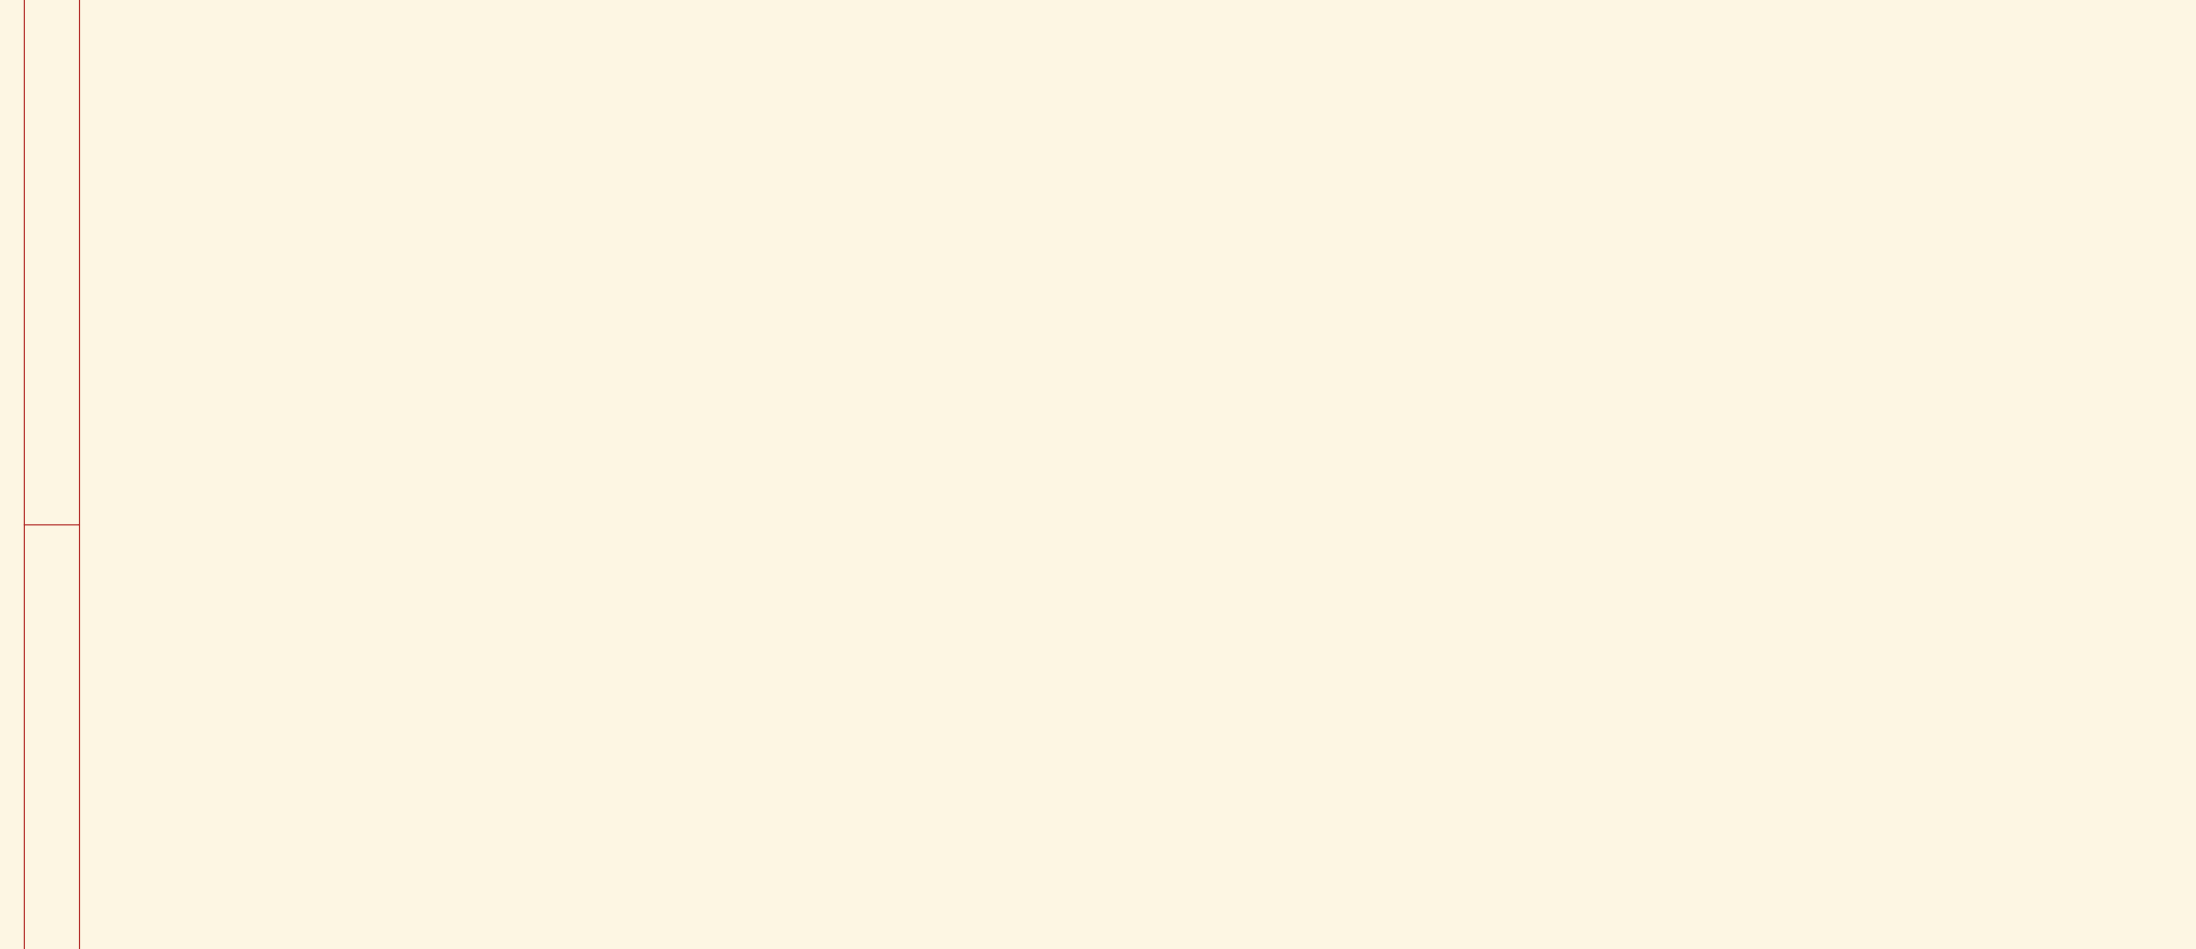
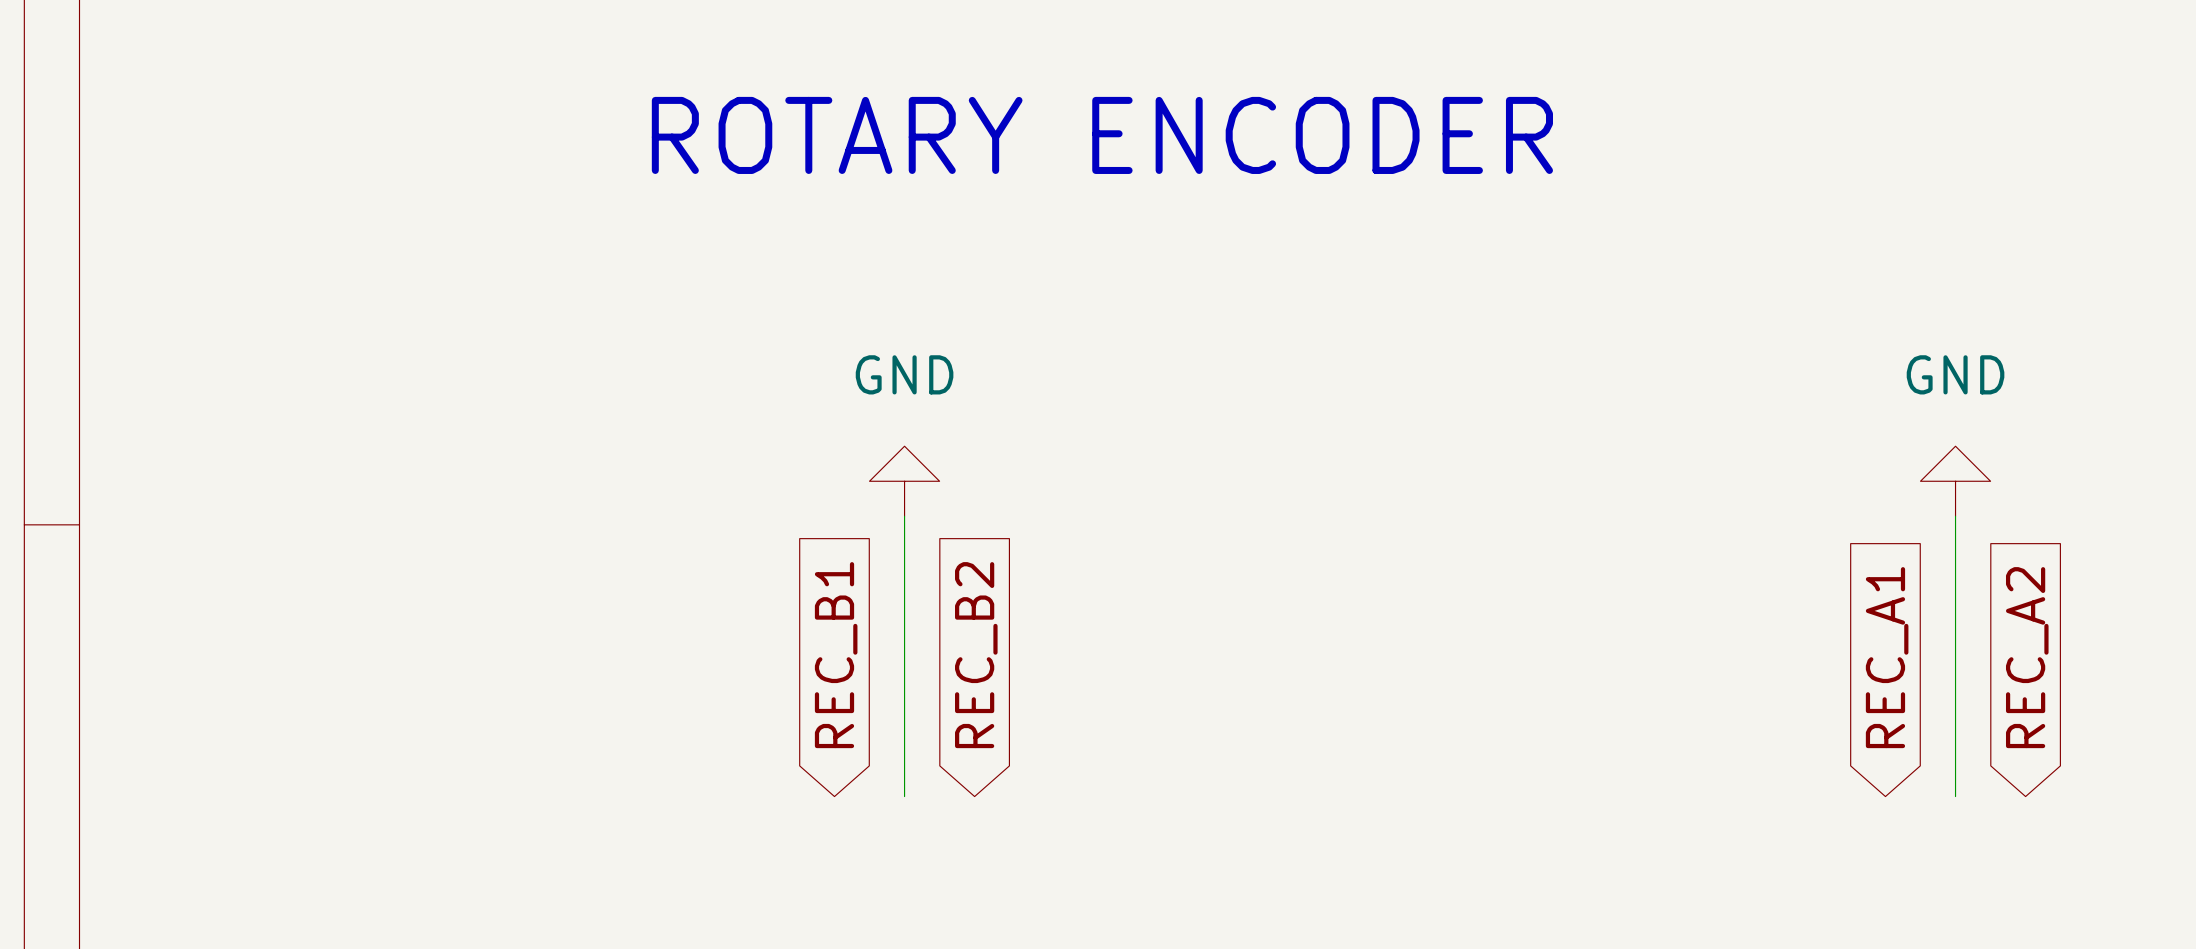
text: none -> ROTARY ENCODER (1102, 135)
power symbol: none -> GND (904, 481)
power symbol: none -> GND (1955, 481)
wire: none -> (904, 516) (904, 796)
wire: none -> (1955, 516) (1955, 796)
global label: none -> REC_B1 (836, 655)
global label: none -> REC_B2 (976, 655)
global label: none -> REC_A1 (1887, 657)
global label: none -> REC_A2 (2027, 657)

